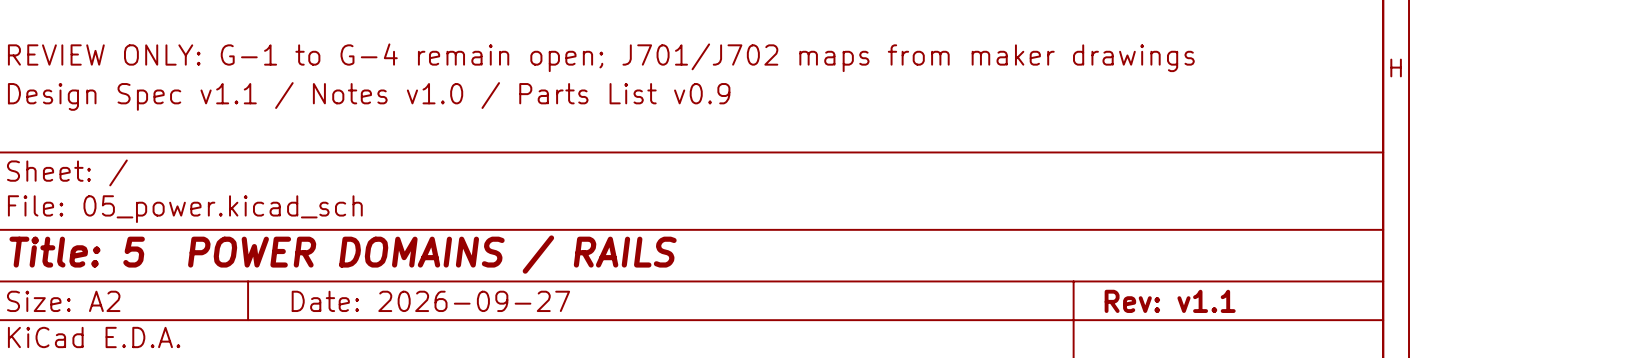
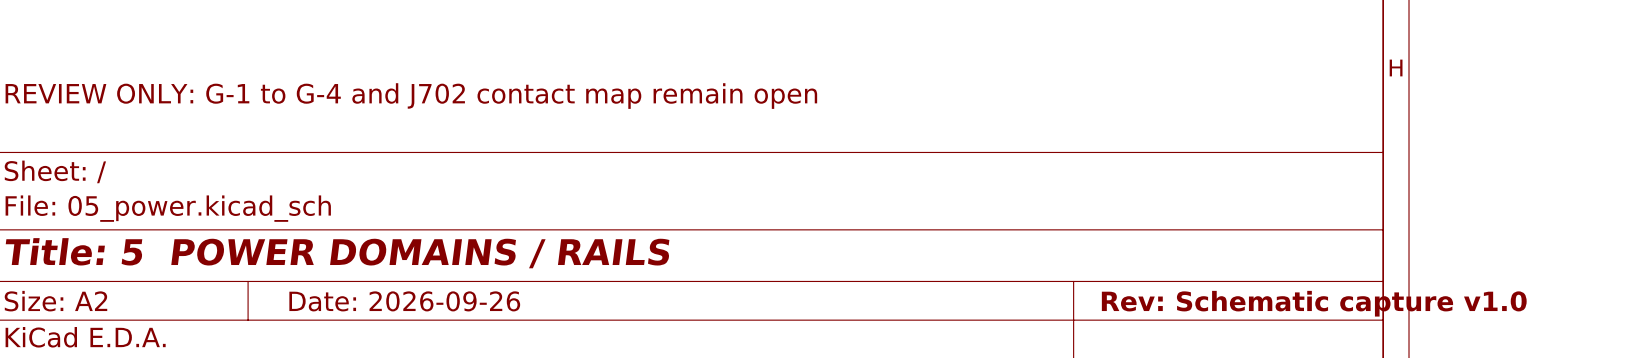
title block: REVIEW ONLY: G-1 to G-4 remain open; J701/J702 maps from maker drawings (601, 57) -> none
title block: Design Spec v1.1 / Notes v1.0 / Parts List v0.9 (369, 96) -> REVIEW ONLY: G-1 to G-4 and J702 contact map remain open (411, 96)
title block: Date: 2026-09-27 (430, 301) -> Date: 2026-09-26 (404, 301)
title block: Rev: v1.1 (1170, 301) -> Rev: Schematic capture v1.0 (1314, 303)

